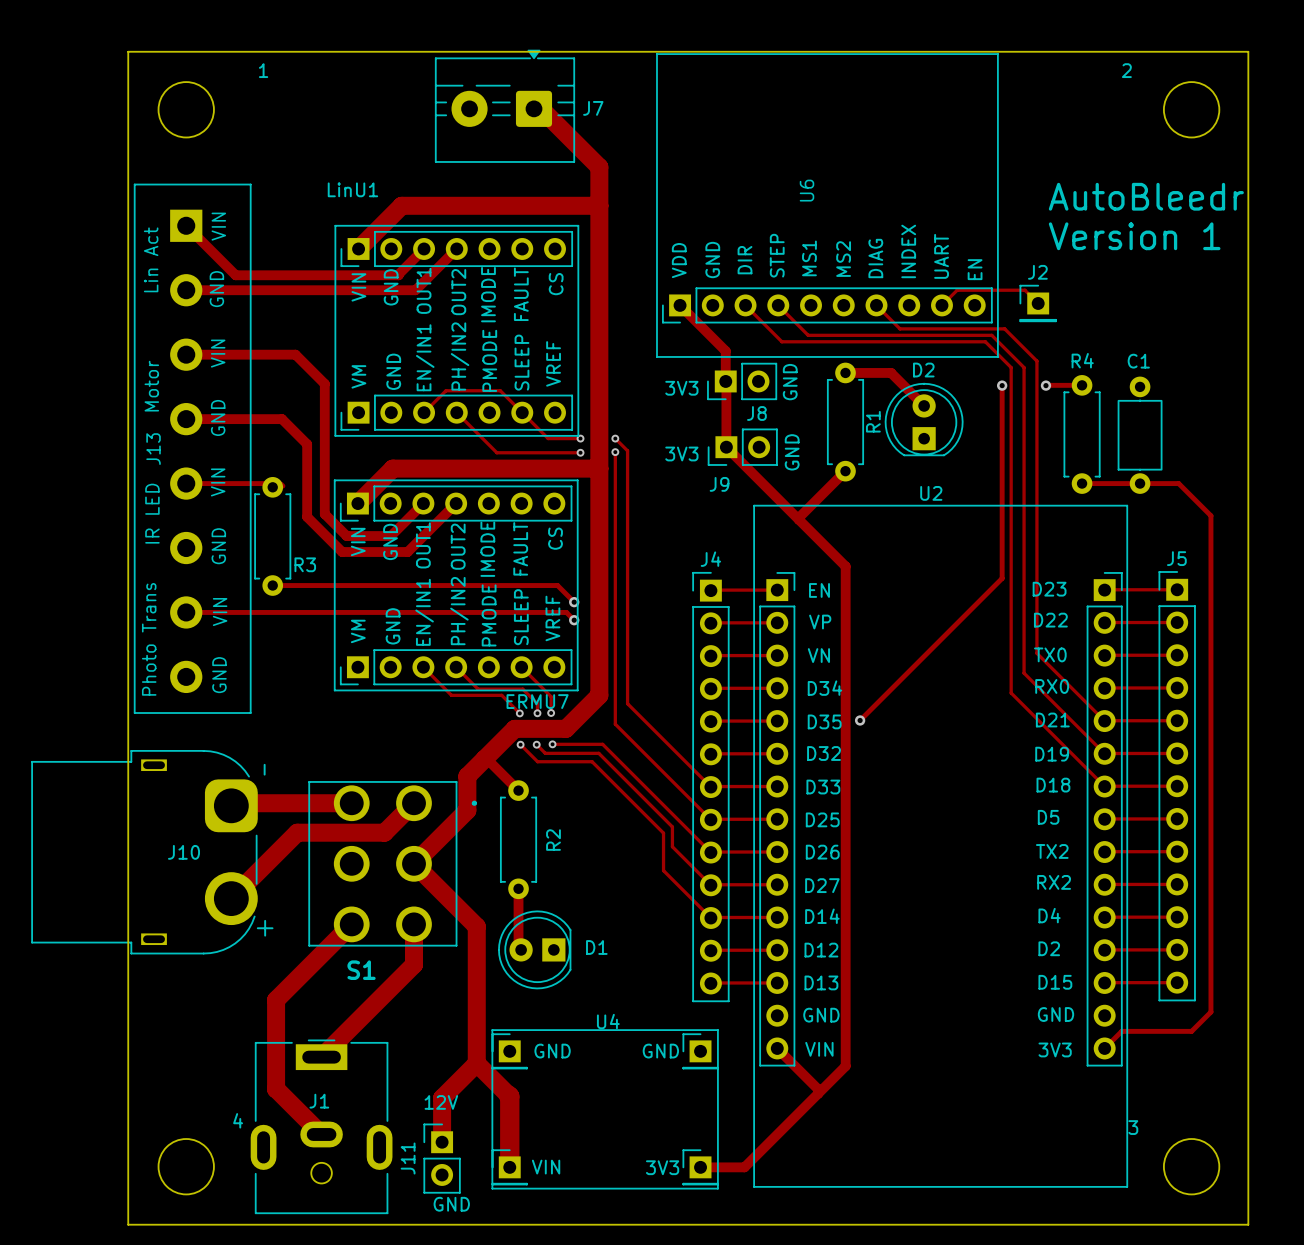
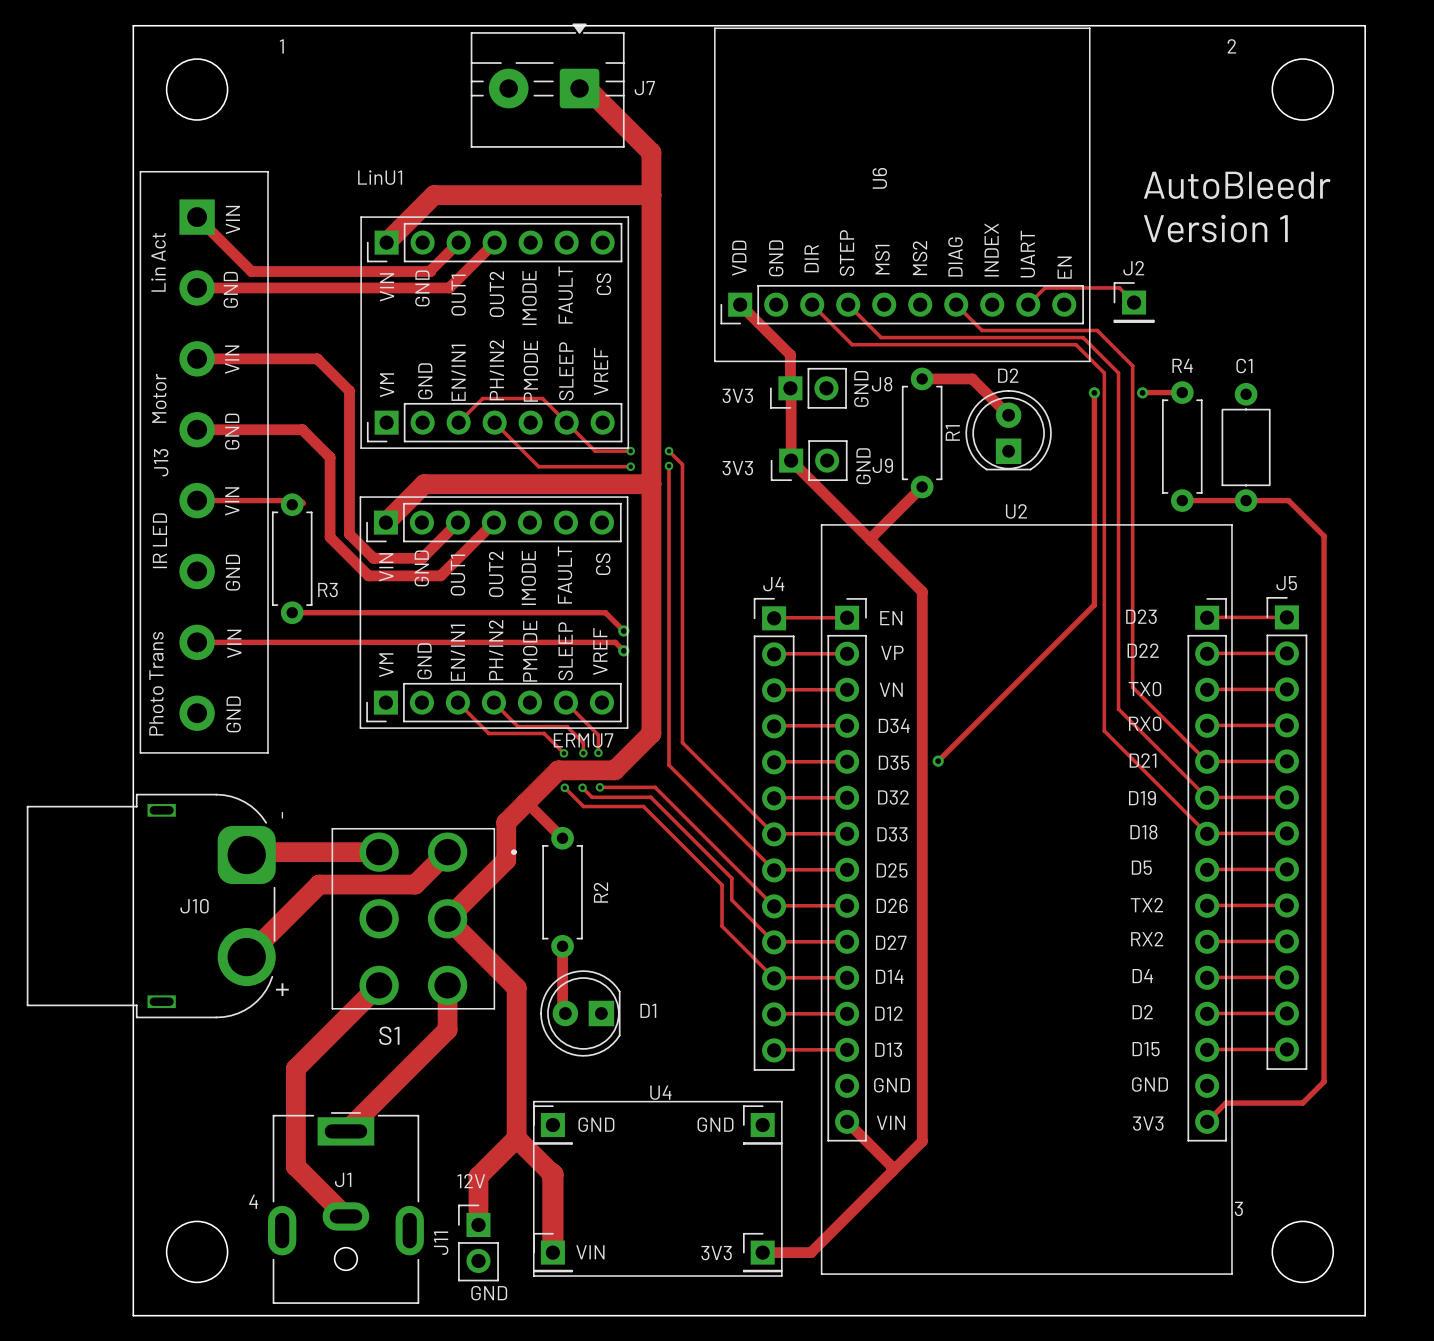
J8 name position: J8 (756, 413) -> J8 (882, 384)
J9 name position: J9 (719, 484) -> J9 (882, 465)

